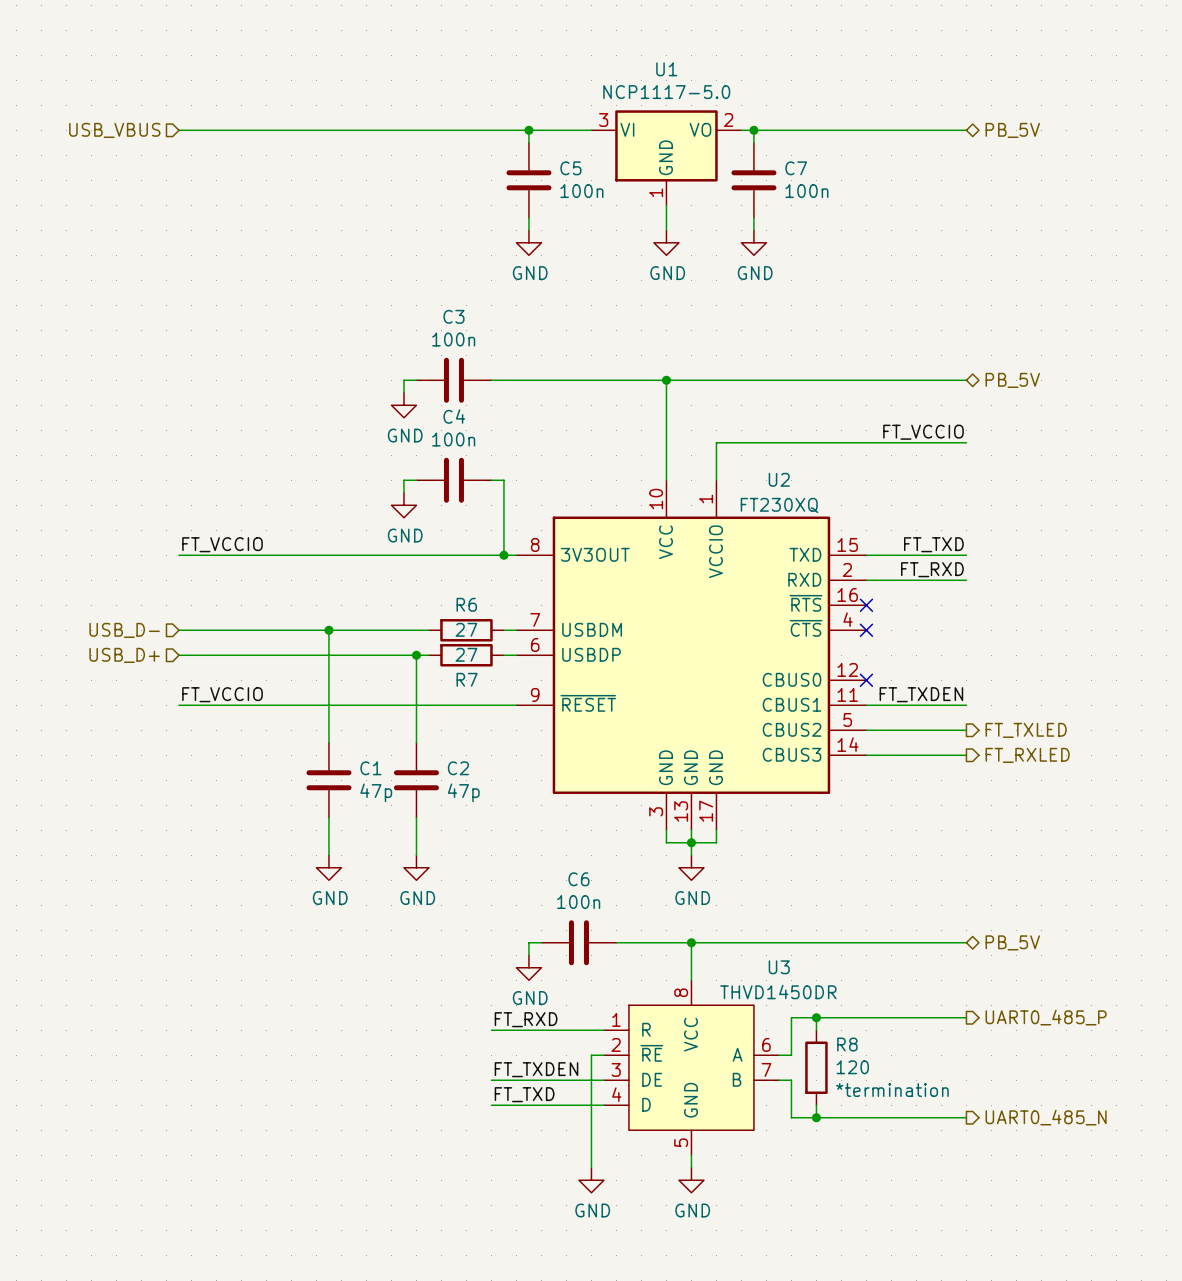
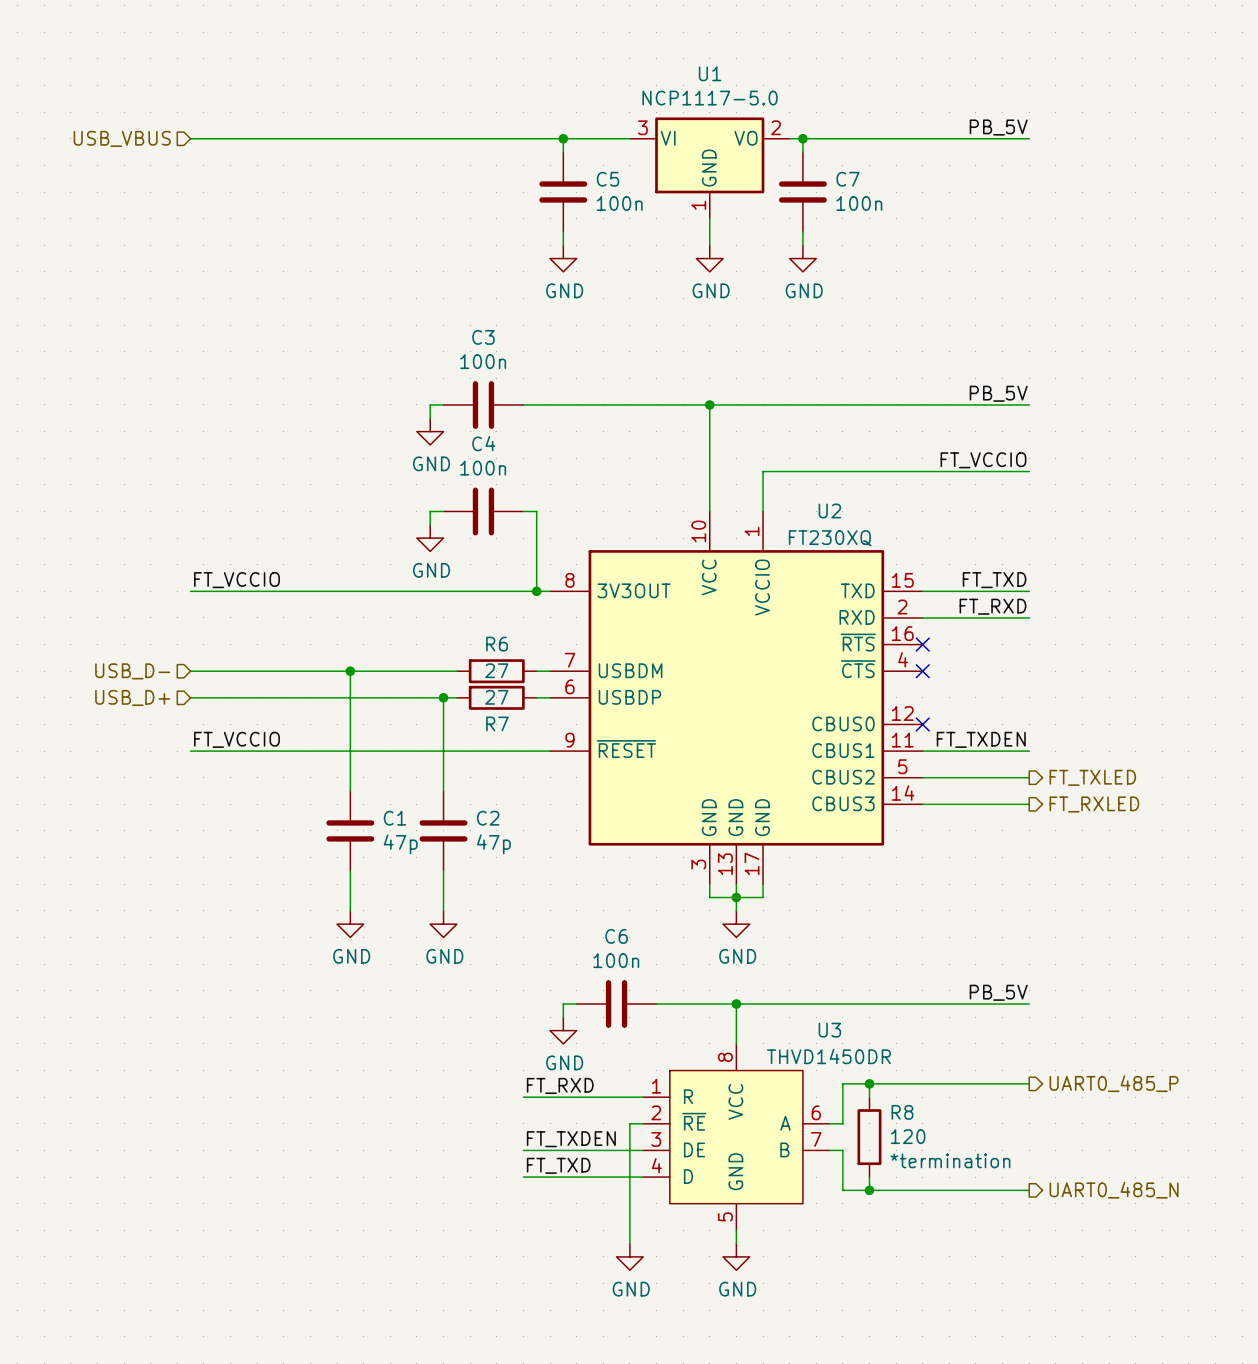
label: none -> PB_5V (998, 127)
hierarchical label: PB_5V (1012, 130) -> none
label: none -> PB_5V (998, 393)
hierarchical label: PB_5V (1012, 380) -> none
label: none -> PB_5V (998, 992)
hierarchical label: PB_5V (1012, 942) -> none

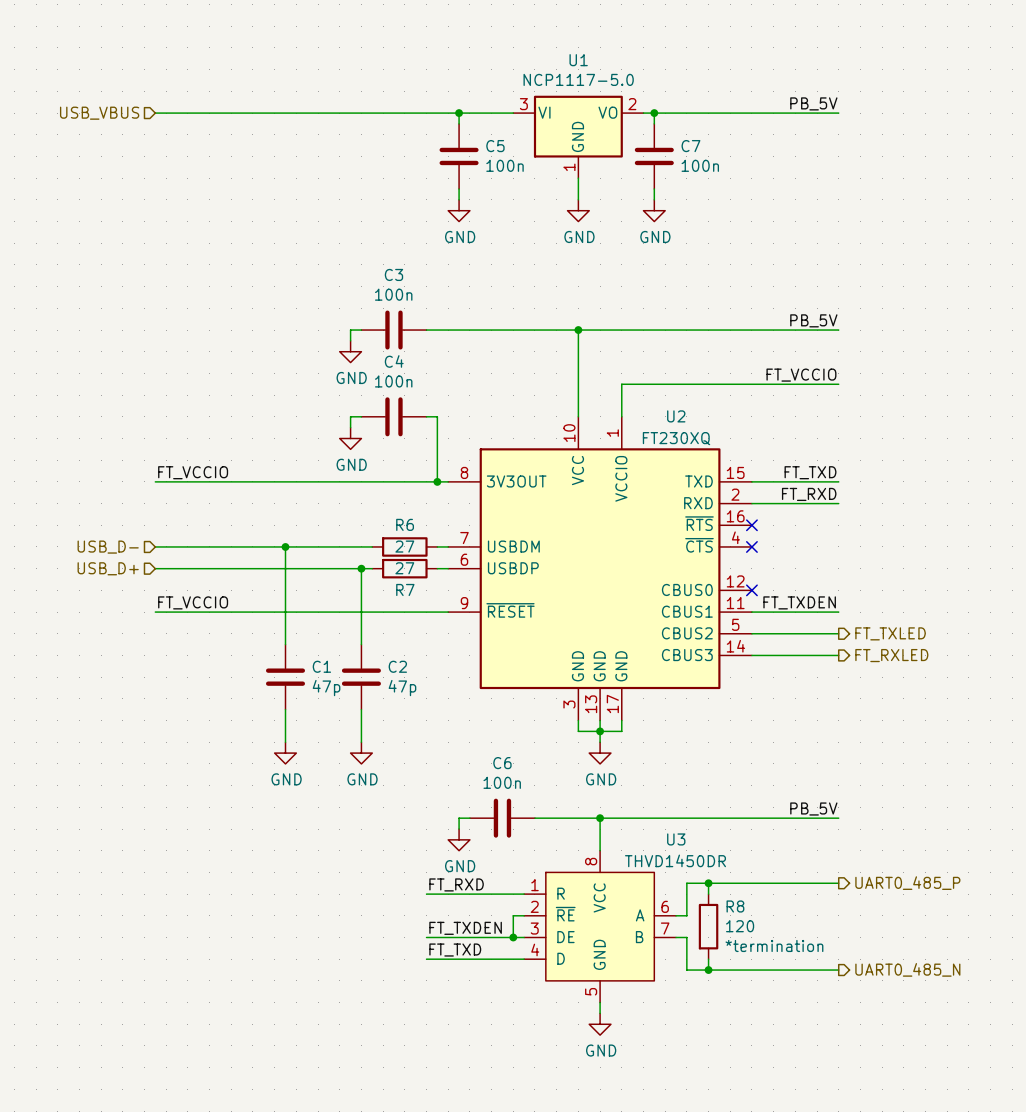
wire: (629, 1150) (629, 1243) -> none
junction: none -> (513, 937)
power symbol: GND (629, 1256) -> none

